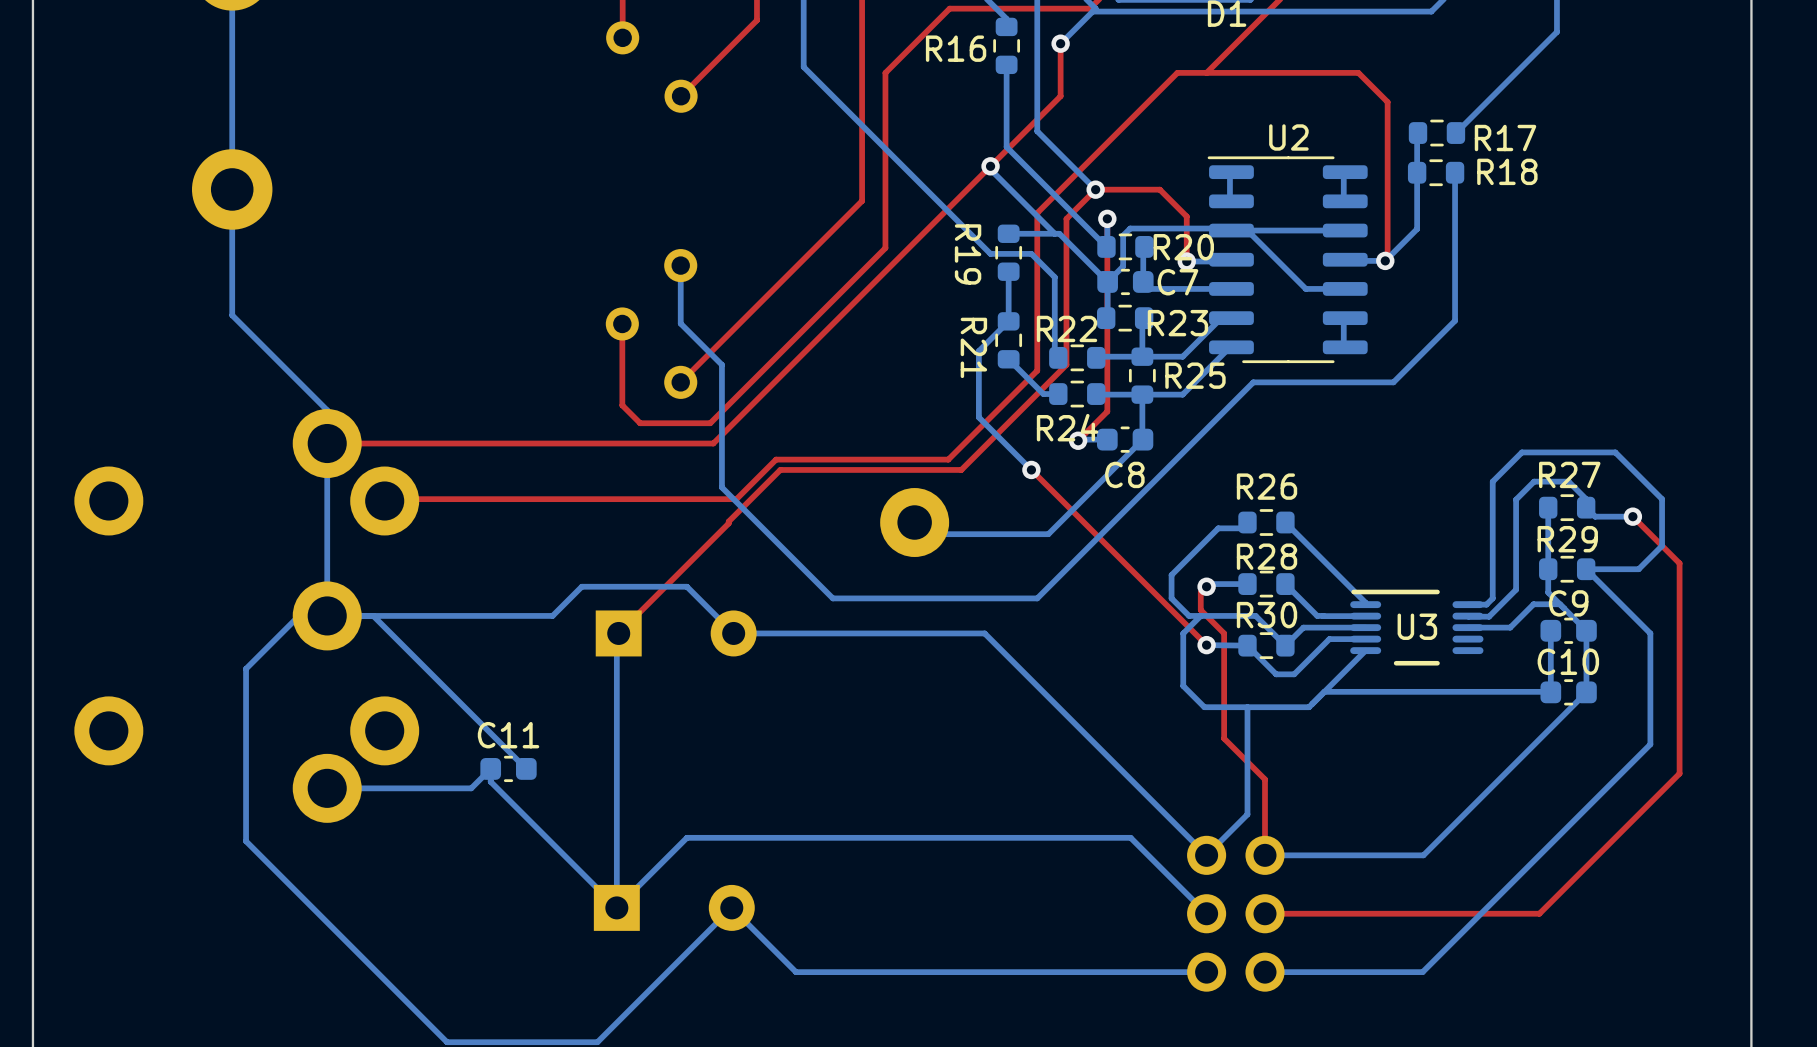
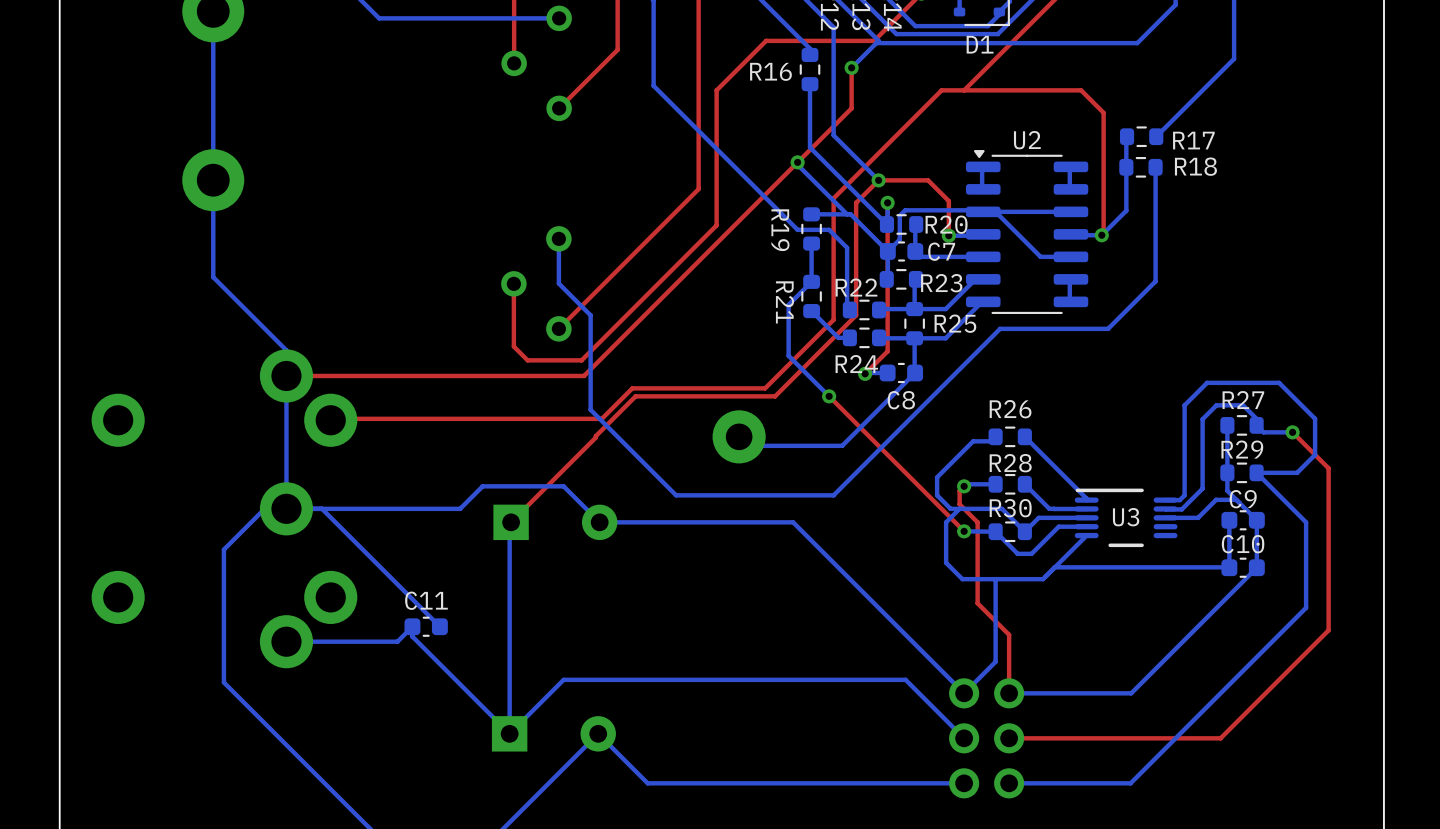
U2 footprint: [1207, 156, 1368, 364] -> [966, 150, 1089, 314]

